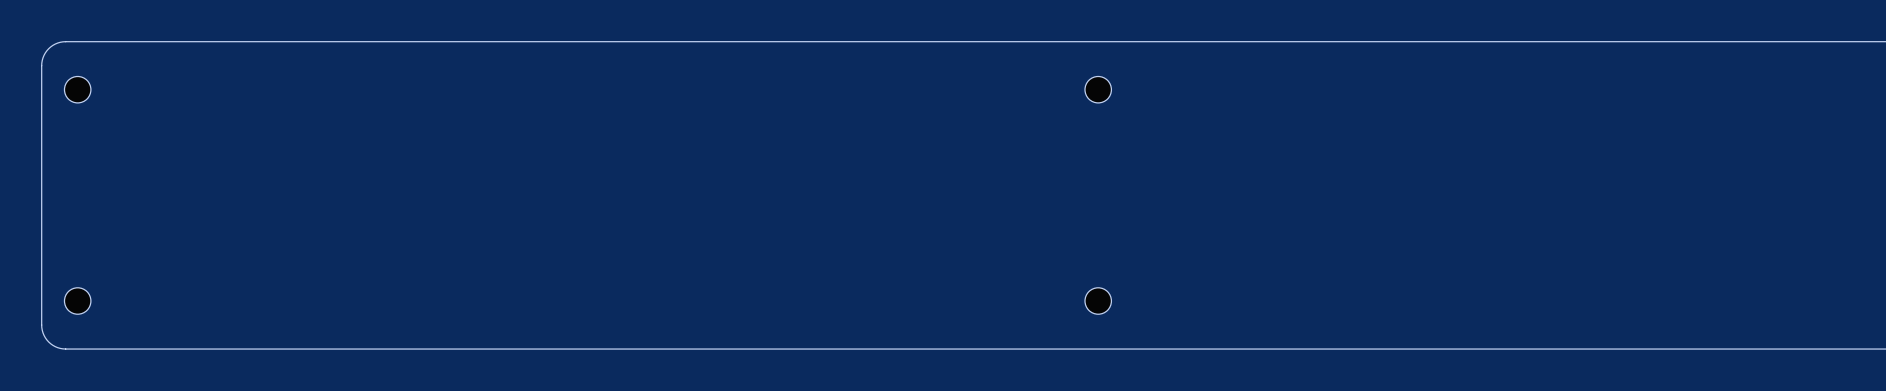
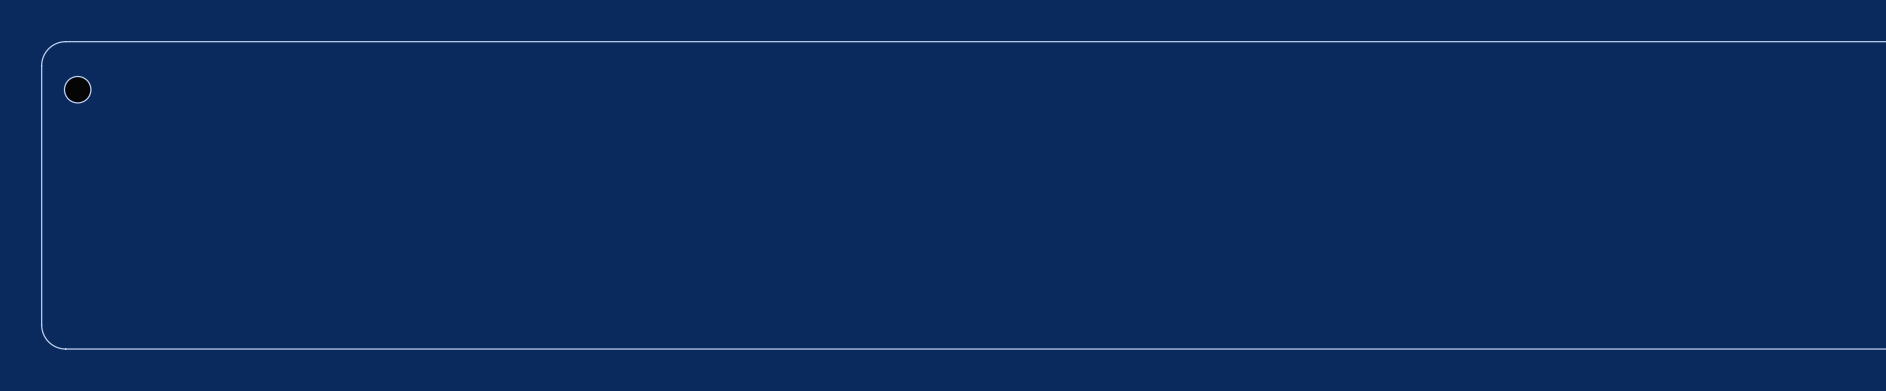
part: (1098, 89) -> none
part: (77, 301) -> none
part: (1098, 301) -> none

